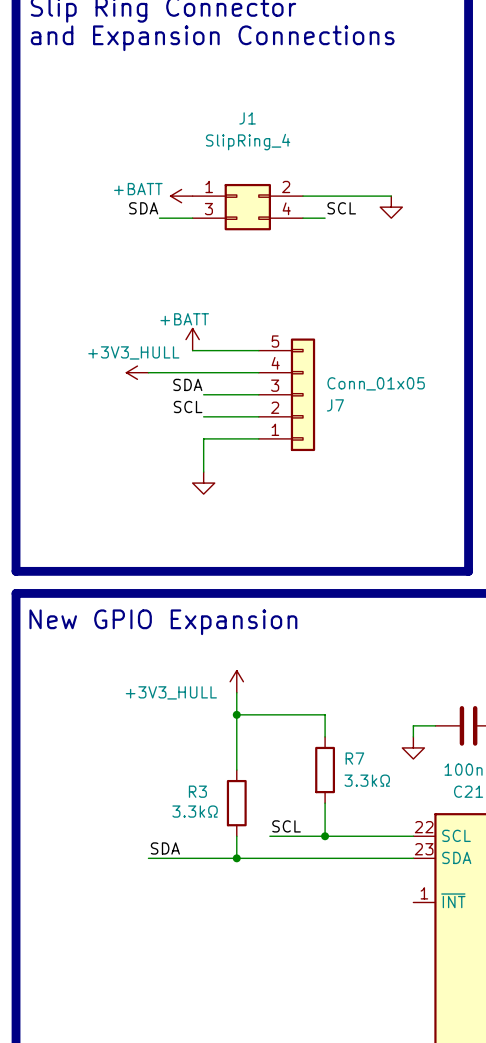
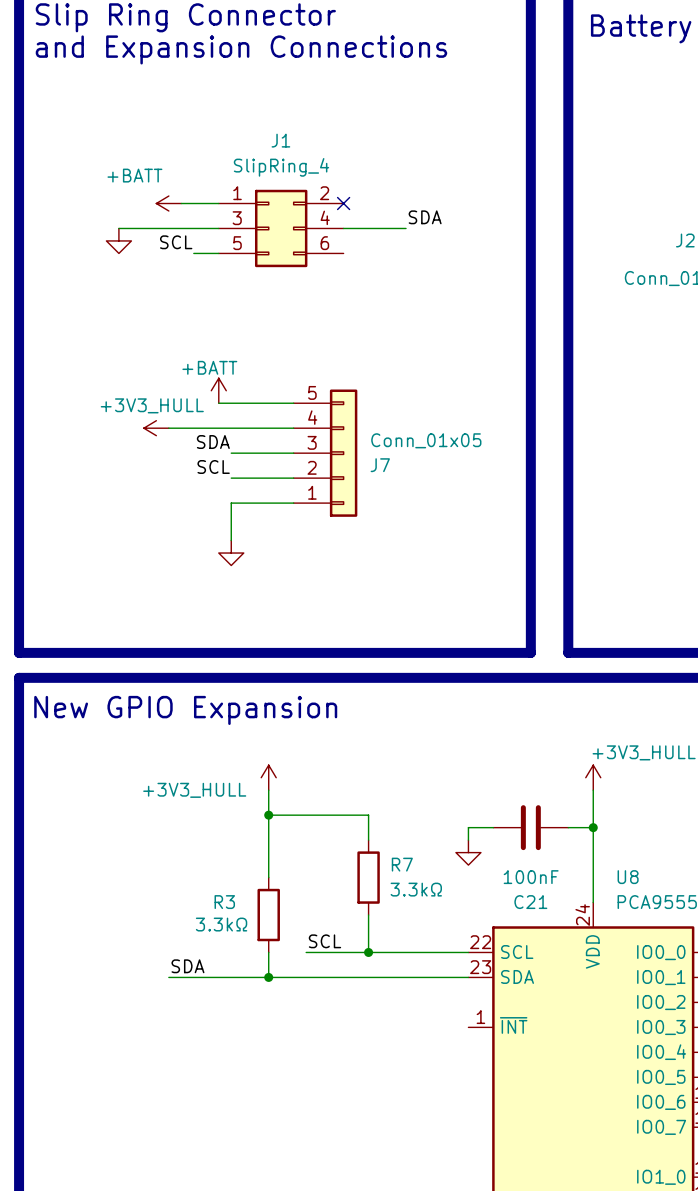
no-connect mark: none -> (343, 203)
J1 symbol: [192, 183, 304, 231] -> [218, 189, 344, 268]
power symbol text position: +BATT (138, 189) -> +BATT (134, 175)
wire: none -> (118, 228) (218, 228)
power symbol position: +BATT (181, 196) -> +BATT (168, 203)
wire: (358, 196) (391, 196) -> (181, 203) (218, 203)
power symbol: none -> (118, 240)
power symbol: (391, 207) -> none
label position: SDA (143, 208) -> SDA (425, 217)
label position: SCL (341, 208) -> SCL (176, 242)
wire: (159, 218) (170, 218) -> none
wire: (303, 218) (325, 218) -> none

